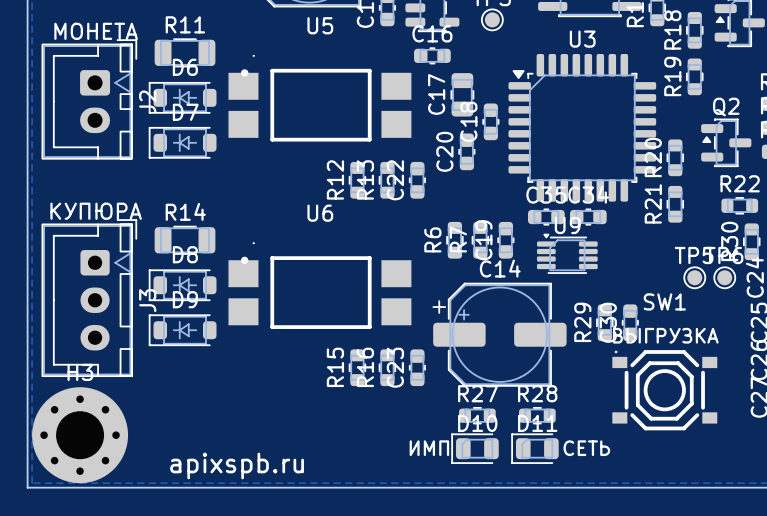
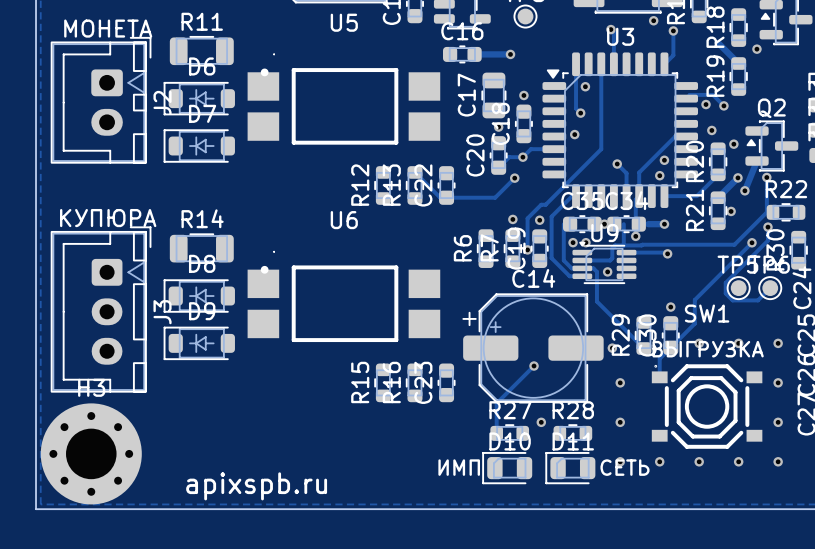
via: none -> (653, 20)
track: none -> (610, 29) (613, 32) (613, 64)
via: none -> (610, 29)
track: none -> (673, 30) (673, 55) (664, 64)
via: none -> (673, 30)
track: none -> (718, 43) (738, 63)
via: none -> (756, 49)
track: none -> (474, 54) (510, 54)
via: none -> (510, 54)
track: none -> (576, 64) (576, 108) (580, 113)
track: none -> (601, 64) (601, 149) (545, 204) (541, 204) (527, 218) (527, 249)
via: none -> (585, 86)
via: none -> (523, 95)
track: none -> (686, 98) (689, 94) (712, 94) (723, 105)
via: none -> (706, 104)
via: none -> (723, 105)
via: none -> (580, 113)
via: none -> (498, 127)
via: none -> (711, 130)
via: none -> (574, 134)
track: none -> (686, 136) (675, 136) (639, 172) (639, 196) (635, 199) (635, 236)
via: none -> (733, 144)
track: none -> (554, 149) (530, 149) (522, 157) (509, 157) (498, 167)
via: none -> (522, 157)
via: none -> (664, 160)
track: none -> (757, 161) (744, 190)
track: none -> (617, 164) (626, 173) (626, 196)
via: none -> (617, 164)
track: none -> (414, 172) (440, 197) (495, 197) (514, 178)
track: none -> (718, 174) (696, 196) (664, 196)
via: none -> (659, 175)
track: none -> (766, 177) (766, 212)
via: none -> (766, 177)
via: none -> (514, 178)
track: none -> (737, 177) (718, 197)
via: none -> (737, 177)
via: none -> (744, 190)
track: none -> (576, 196) (572, 196) (551, 216) (551, 258) (569, 276) (582, 276)
via: none -> (731, 211)
track: none -> (766, 212) (734, 244) (615, 245) (612, 248) (612, 258) (610, 260) (582, 260)
via: none -> (512, 219)
via: none -> (539, 220)
track: none -> (563, 224) (563, 260) (571, 268) (593, 268) (596, 271) (596, 301) (643, 348)
via: none -> (604, 224)
track: none -> (623, 224) (623, 245)
track: none -> (648, 224) (664, 224)
via: none -> (664, 224)
track: none -> (767, 227) (767, 240) (725, 282) (725, 293) (732, 300) (757, 300) (770, 288)
via: none -> (767, 227)
via: none -> (635, 236)
via: none -> (573, 242)
via: none -> (585, 242)
track: none -> (752, 242) (694, 299) (694, 323) (659, 358) (659, 377)
via: none -> (751, 242)
via: none -> (527, 249)
track: none -> (626, 252) (667, 253)
via: none -> (667, 253)
via: none -> (607, 271)
via: none -> (670, 307)
via: none -> (699, 343)
via: none -> (738, 343)
via: none -> (778, 343)
via: none -> (612, 348)
track: none -> (534, 366) (496, 403) (496, 433)
via: none -> (534, 366)
via: none -> (620, 382)
via: none -> (778, 382)
via: none -> (541, 422)
via: none -> (620, 422)
via: none -> (778, 422)
via: none -> (620, 461)
via: none -> (659, 461)
via: none -> (699, 461)
via: none -> (738, 461)
via: none -> (778, 461)

